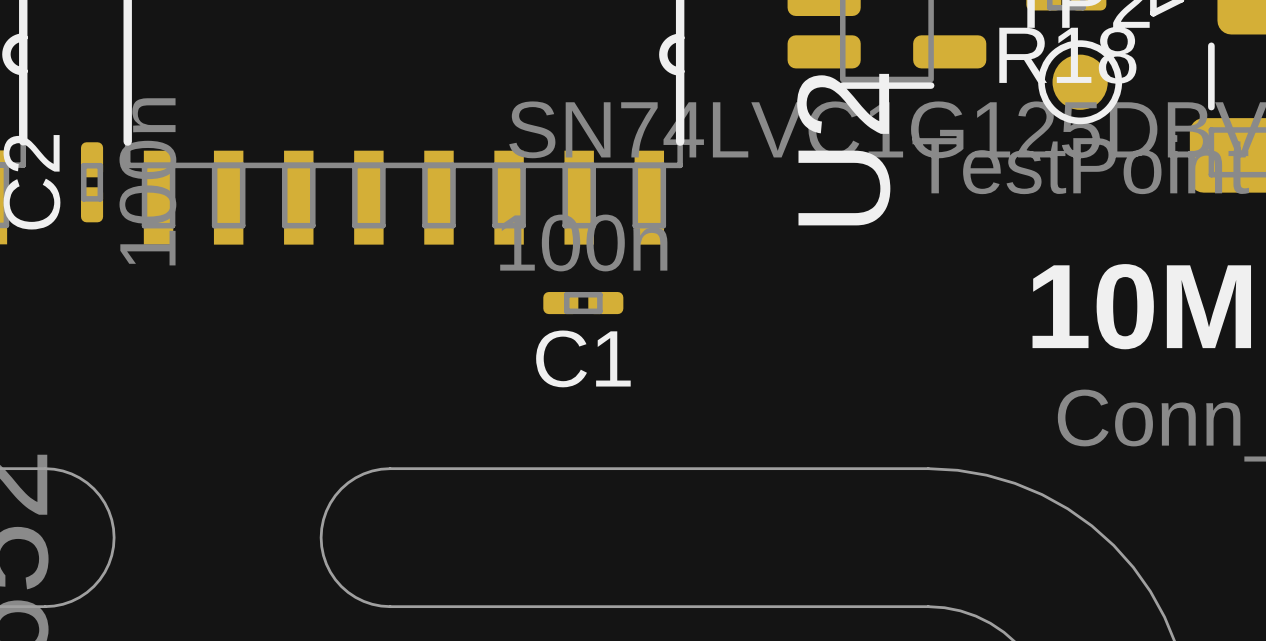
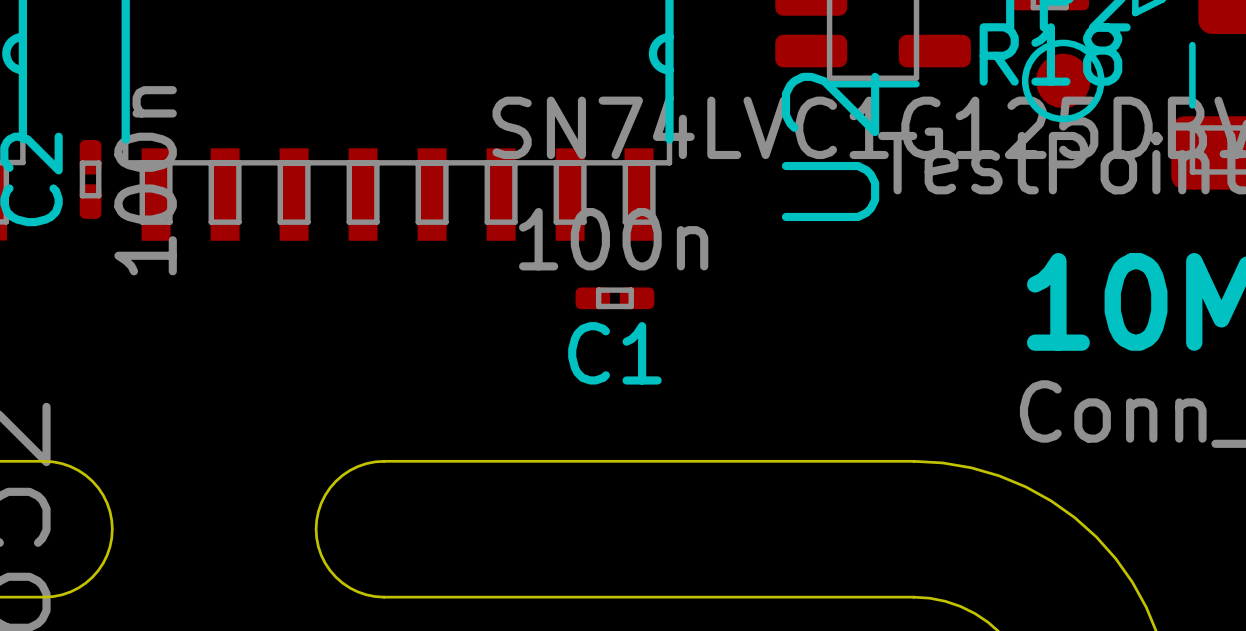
C1 position: (583, 303) -> (614, 298)

